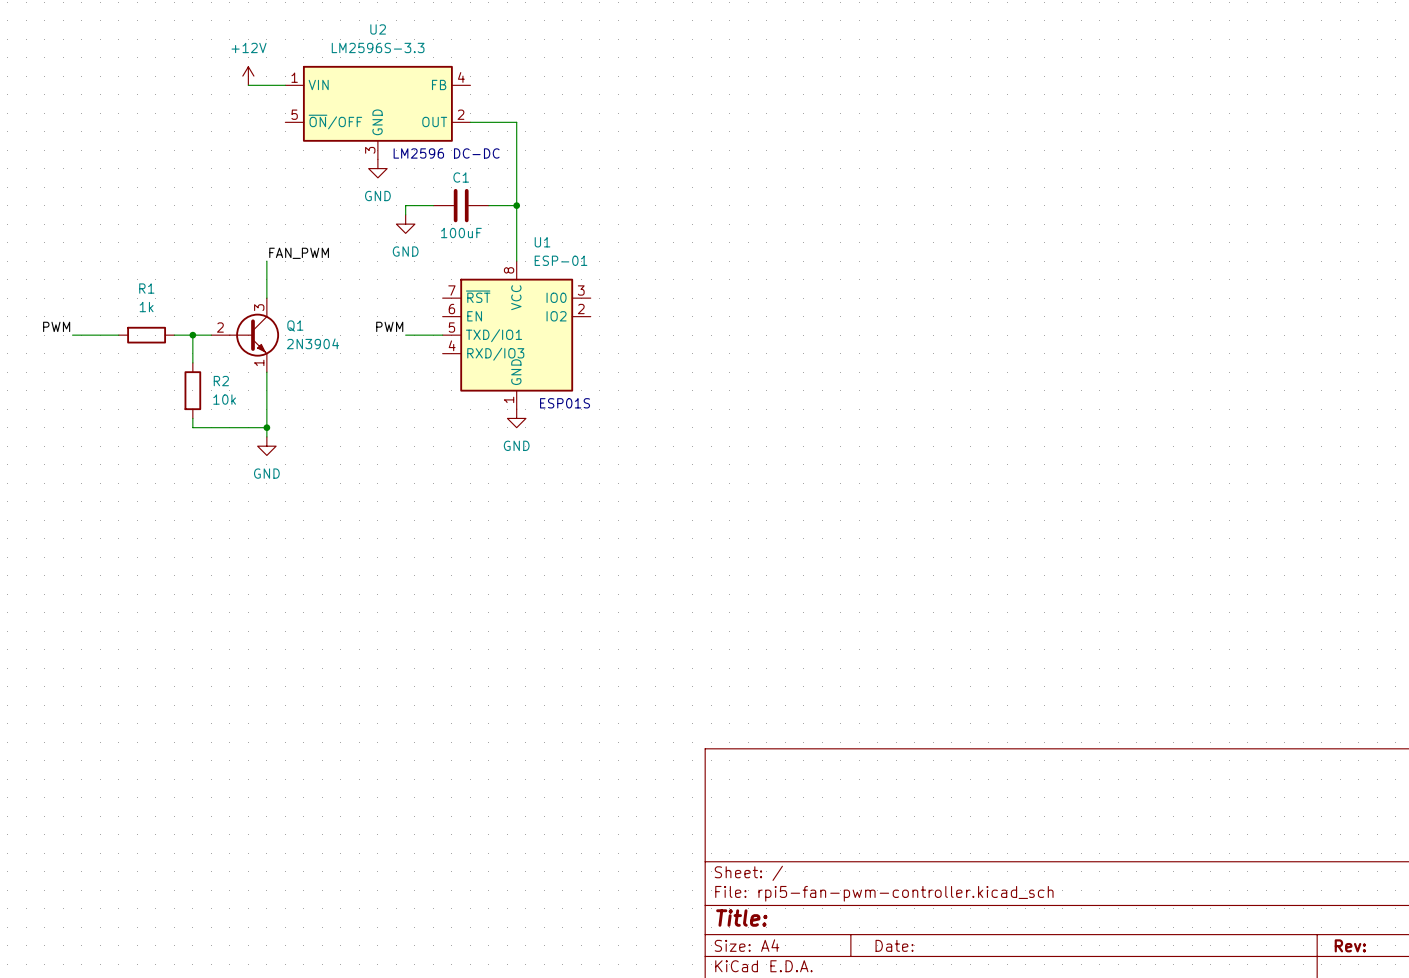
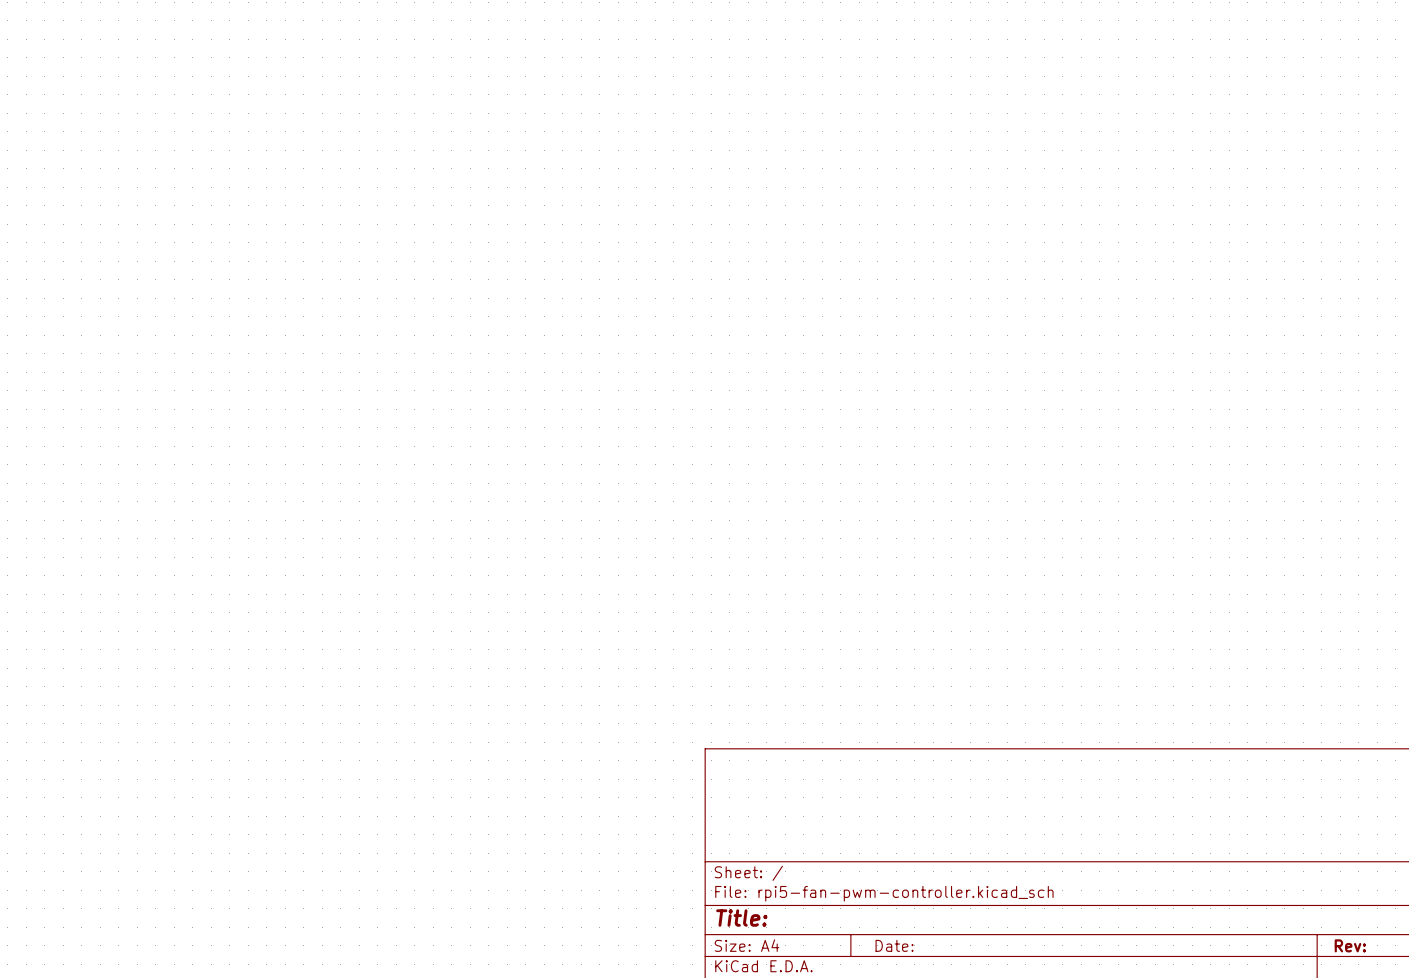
power symbol: +12V (248, 76) -> none
wire: (248, 85) (285, 85) -> none
U2: LM2596S-3.3 (377, 112) -> none
wire: (470, 122) (516, 122) (516, 261) -> none
text: LM2596 DC-DC (446, 153) -> none
power symbol: GND (377, 168) -> none
wire: (433, 205) (405, 205) (405, 214) -> none
C1: 100uF (461, 205) -> none
wire: (488, 205) (516, 205) -> none
junction: (516, 205) -> none
power symbol: GND (405, 224) -> none
label: FAN_PWM (299, 253) -> none
wire: (266, 261) (266, 298) -> none
label: PWM (56, 326) -> none
label: PWM (389, 326) -> none
wire: (72, 335) (118, 335) -> none
R1: 1k (146, 335) -> none
wire: (174, 335) (211, 335) -> none
wire: (192, 335) (192, 362) -> none
junction: (192, 335) -> none
Q1: 2N3904 (245, 335) -> none
wire: (405, 335) (442, 335) -> none
U1: ESP-01 (516, 335) -> none
wire: (266, 372) (266, 436) -> none
R2: 10k (192, 390) -> none
text: ESP01S (565, 403) -> none
wire: (192, 418) (192, 427) (266, 427) -> none
power symbol: GND (516, 418) -> none
junction: (266, 427) -> none
power symbol: GND (266, 446) -> none

